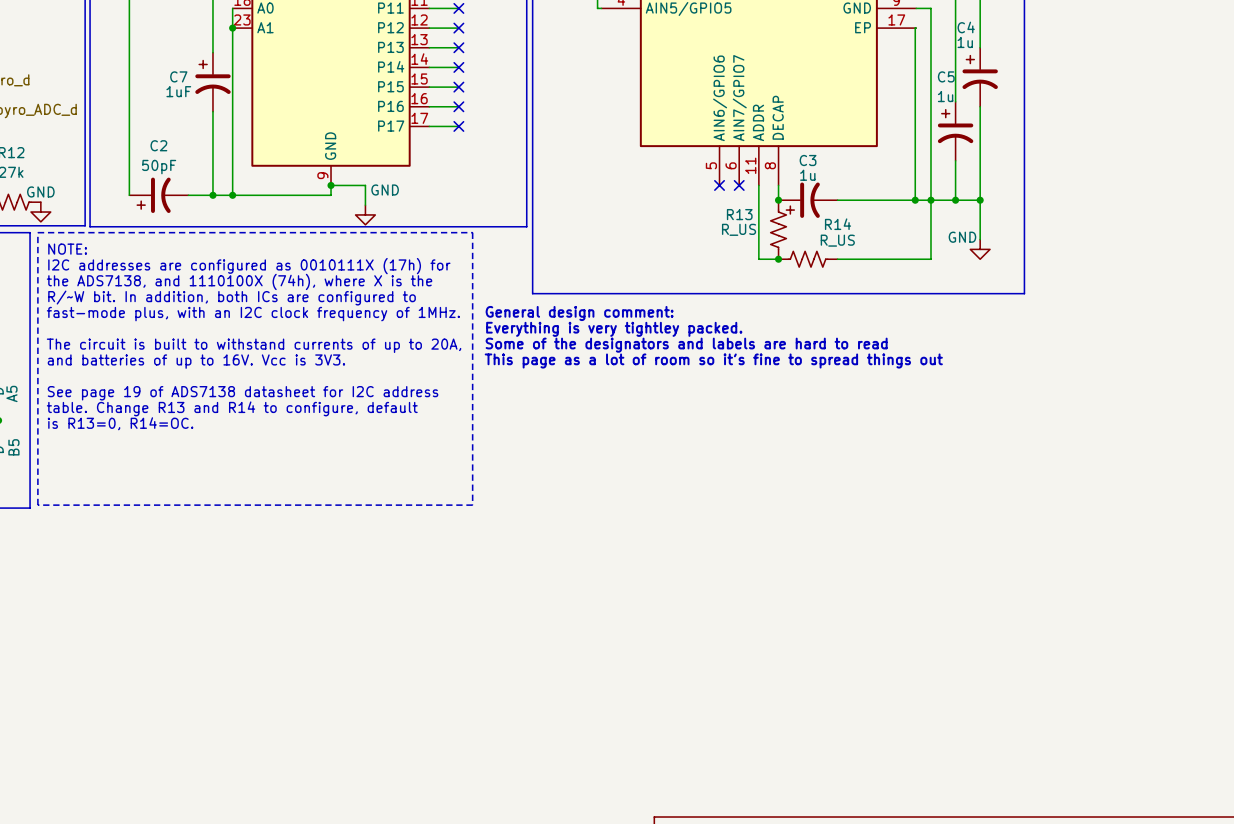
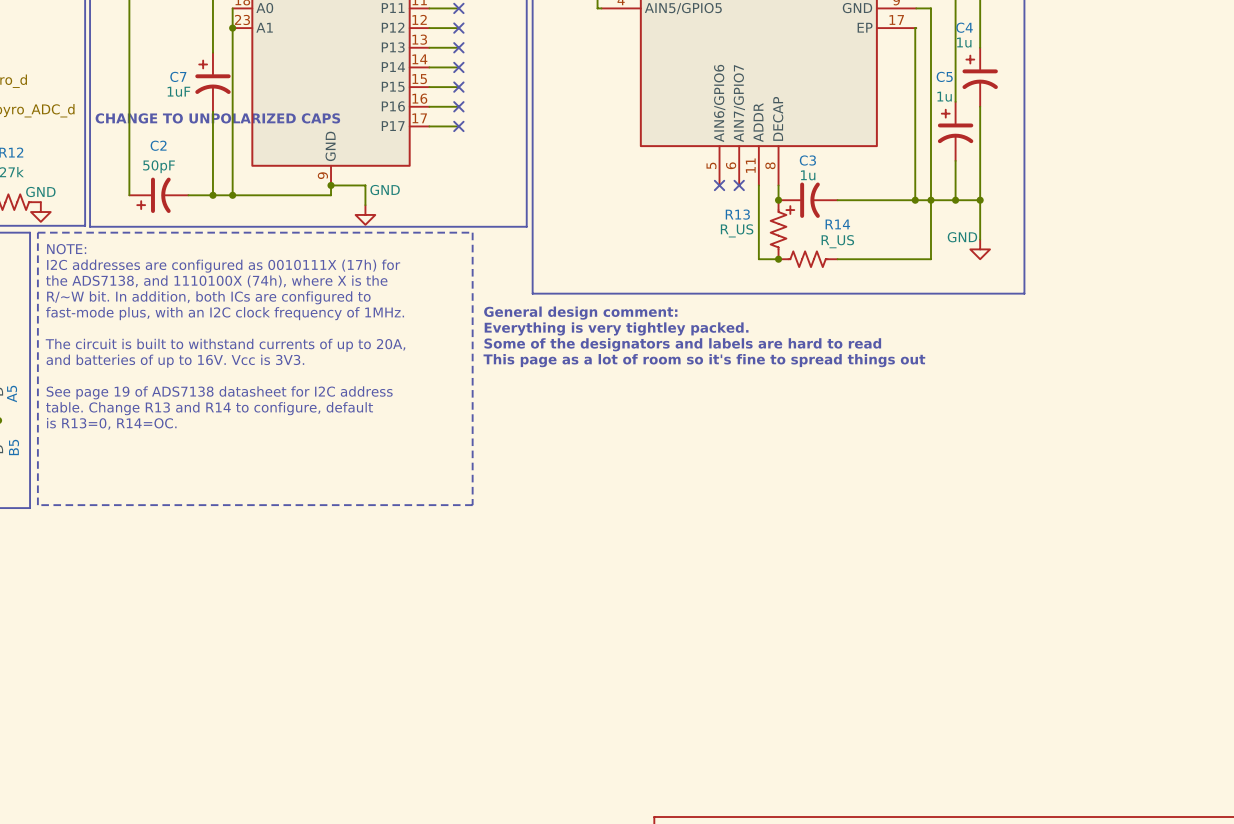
text: none -> CHANGE TO UNPOLARIZED CAPS (217, 118)

